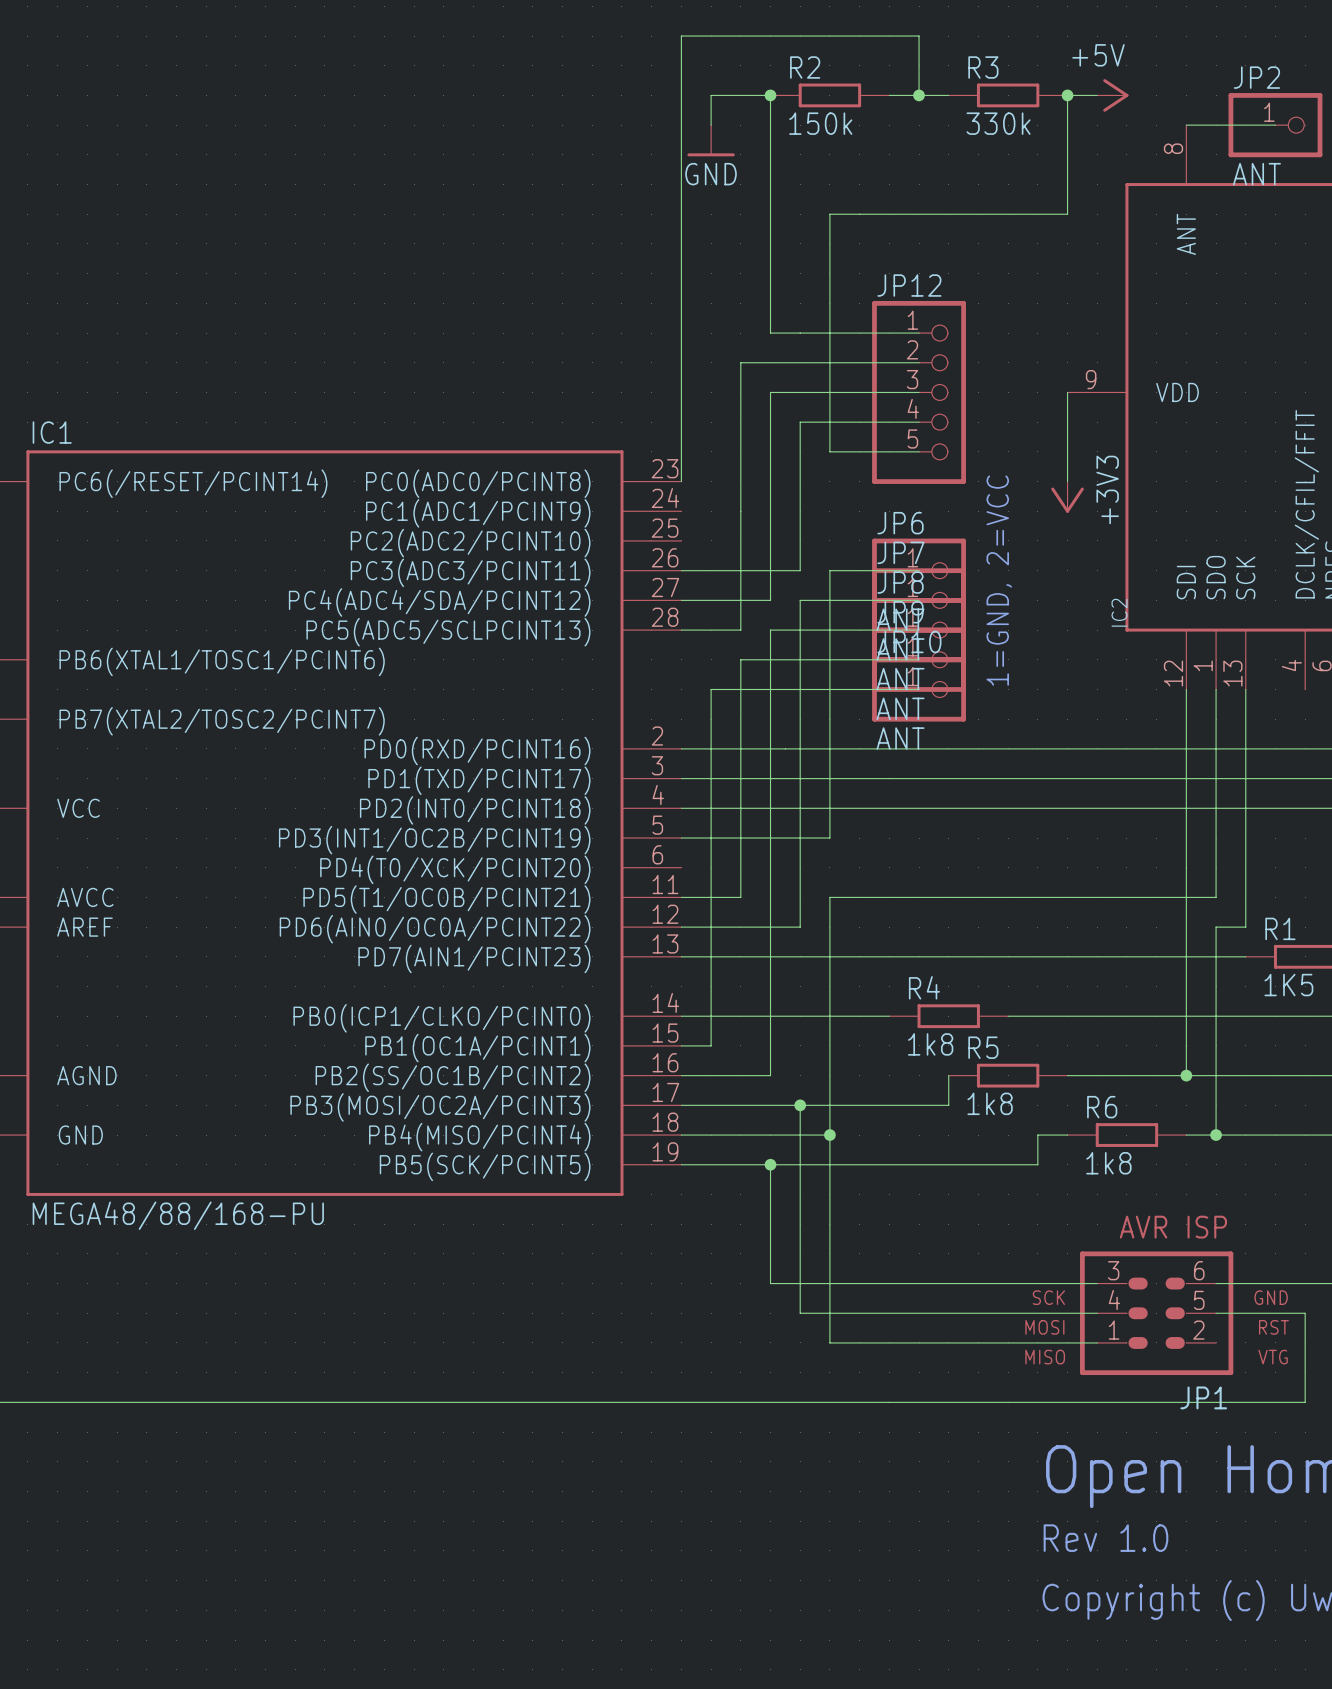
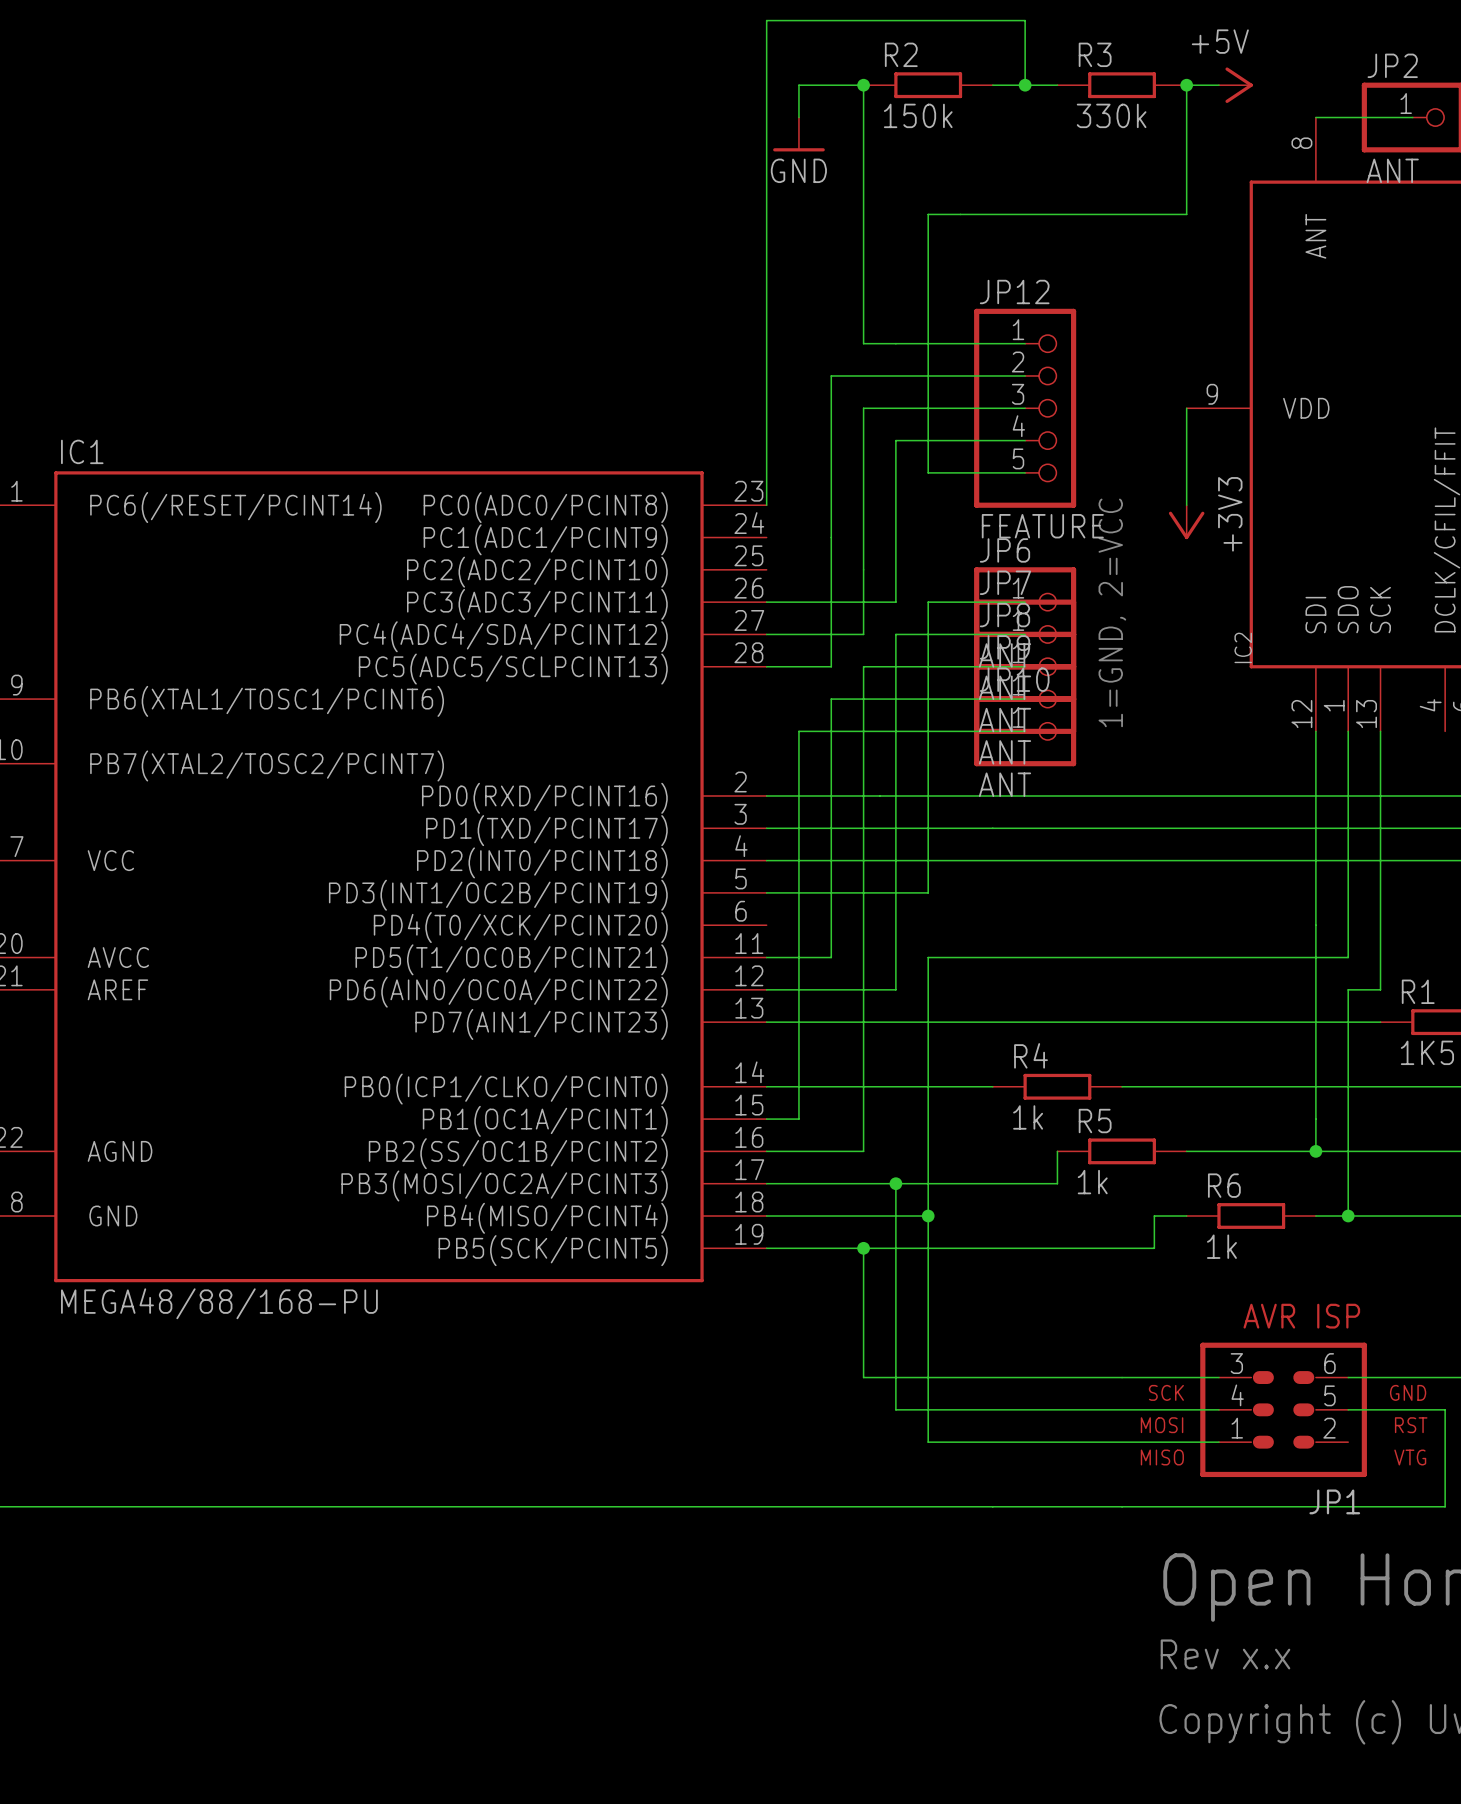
JP12 value: none -> FEATURE (1042, 526)
R4 value: 1k8 (930, 1044) -> 1k (1028, 1117)
R5 value: 1k8 (990, 1103) -> 1k (1092, 1182)
R6 value: 1k8 (1108, 1163) -> 1k (1221, 1246)
text: Rev 1.0 (1105, 1538) -> Rev x.x (1225, 1654)

